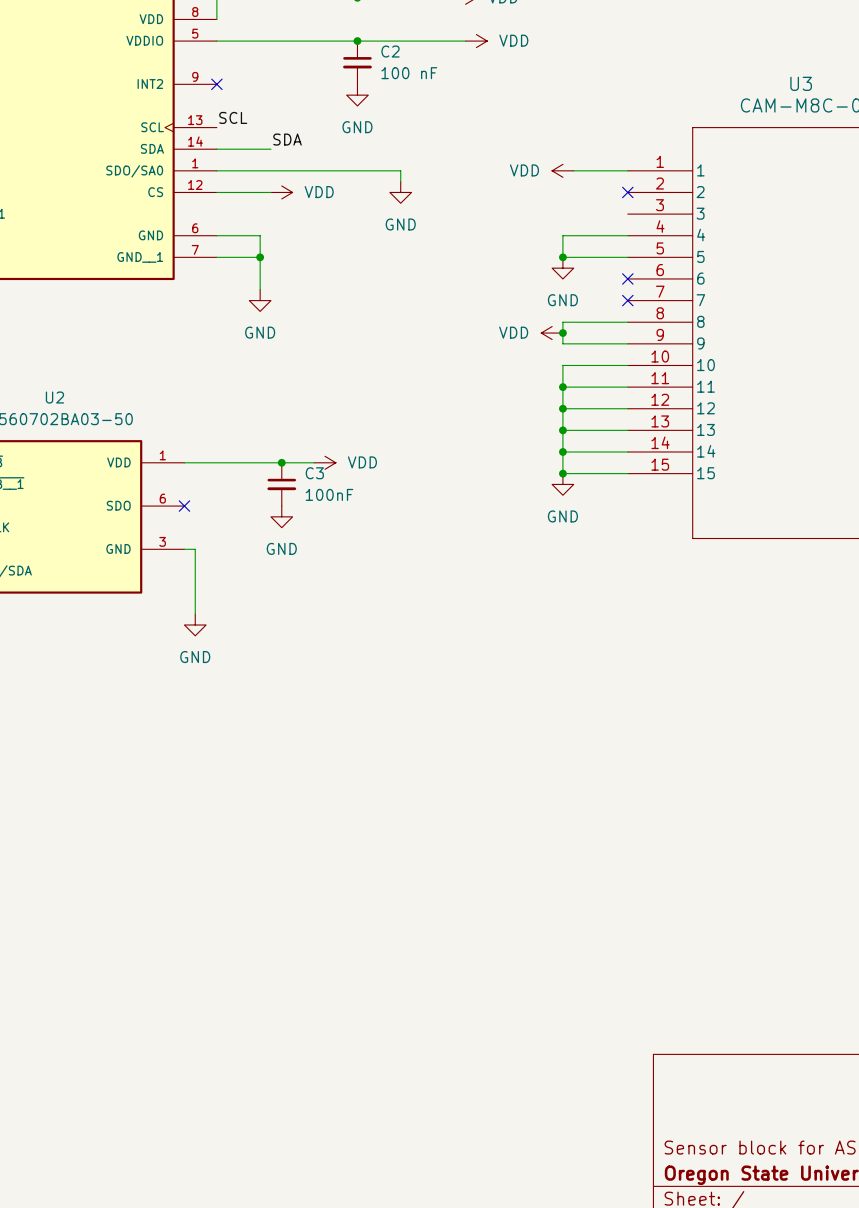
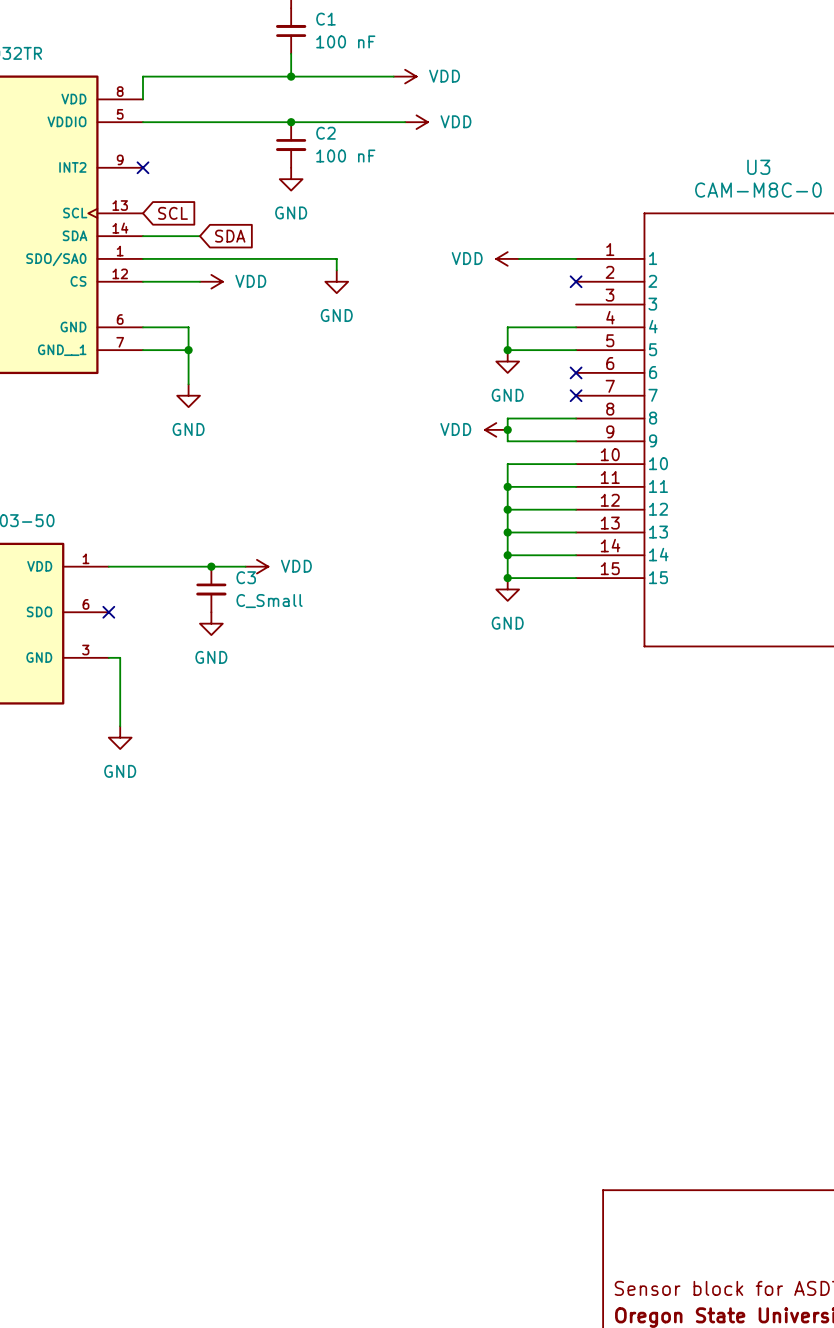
label: SCL (233, 117) -> none
global label: none -> SCL (173, 213)
label: SDA (287, 139) -> none
global label: none -> SDA (230, 236)
C3 value: 100nF (329, 494) -> C_Small (269, 601)

